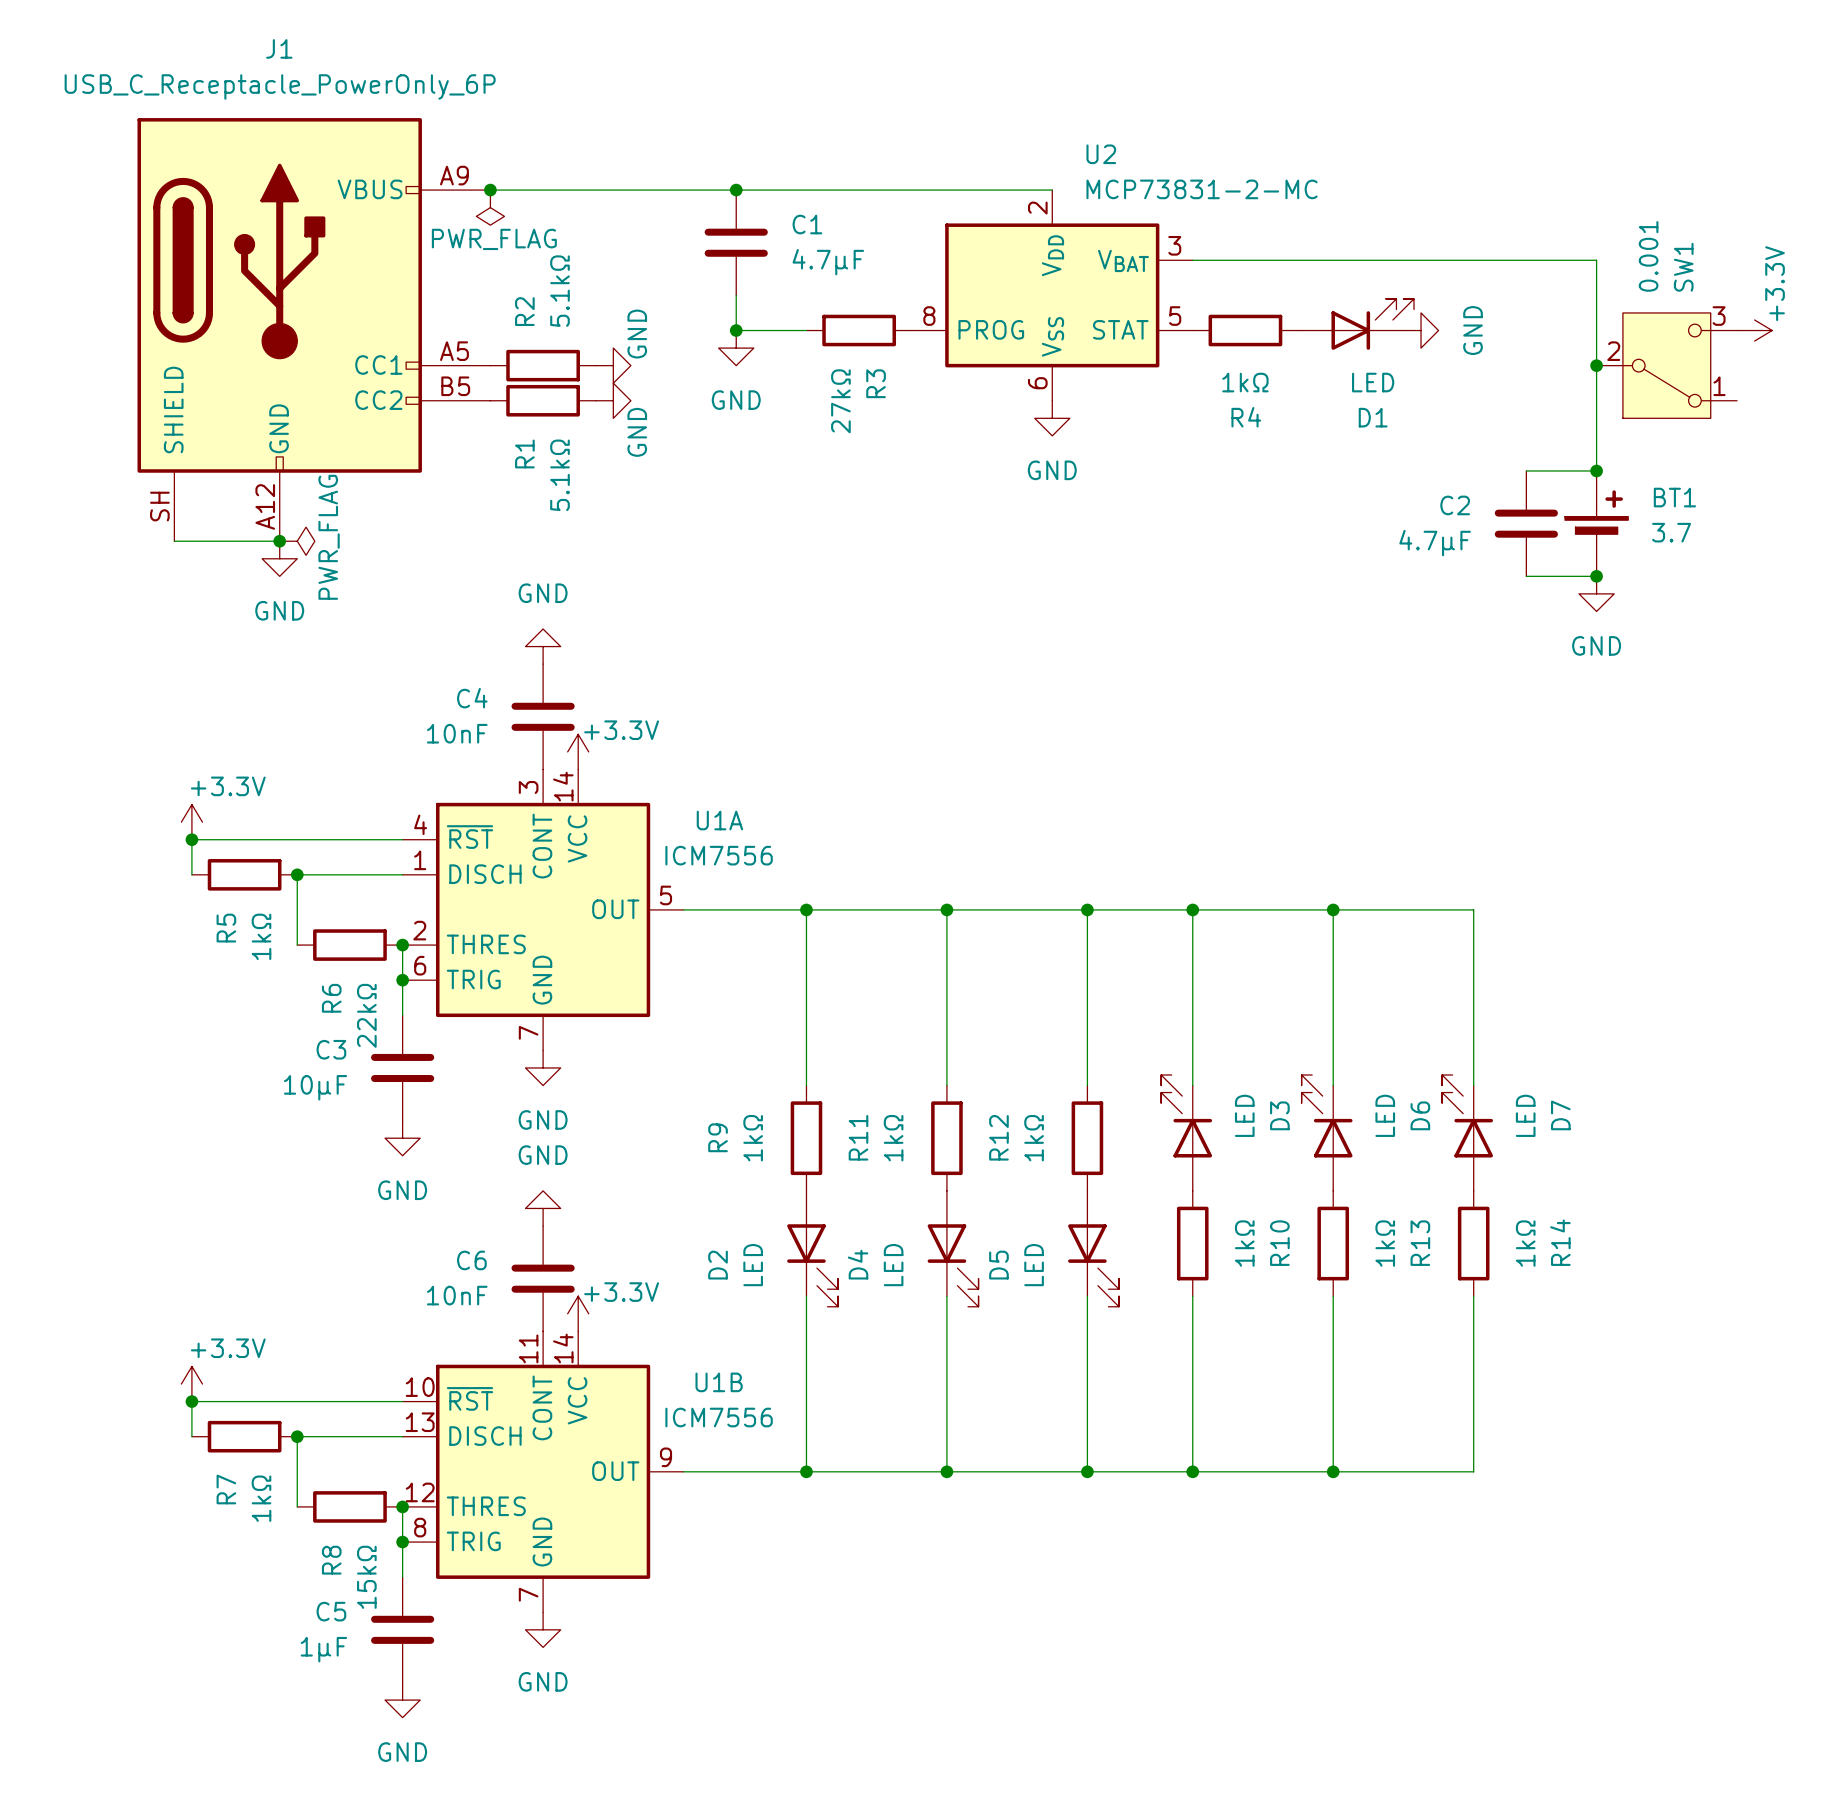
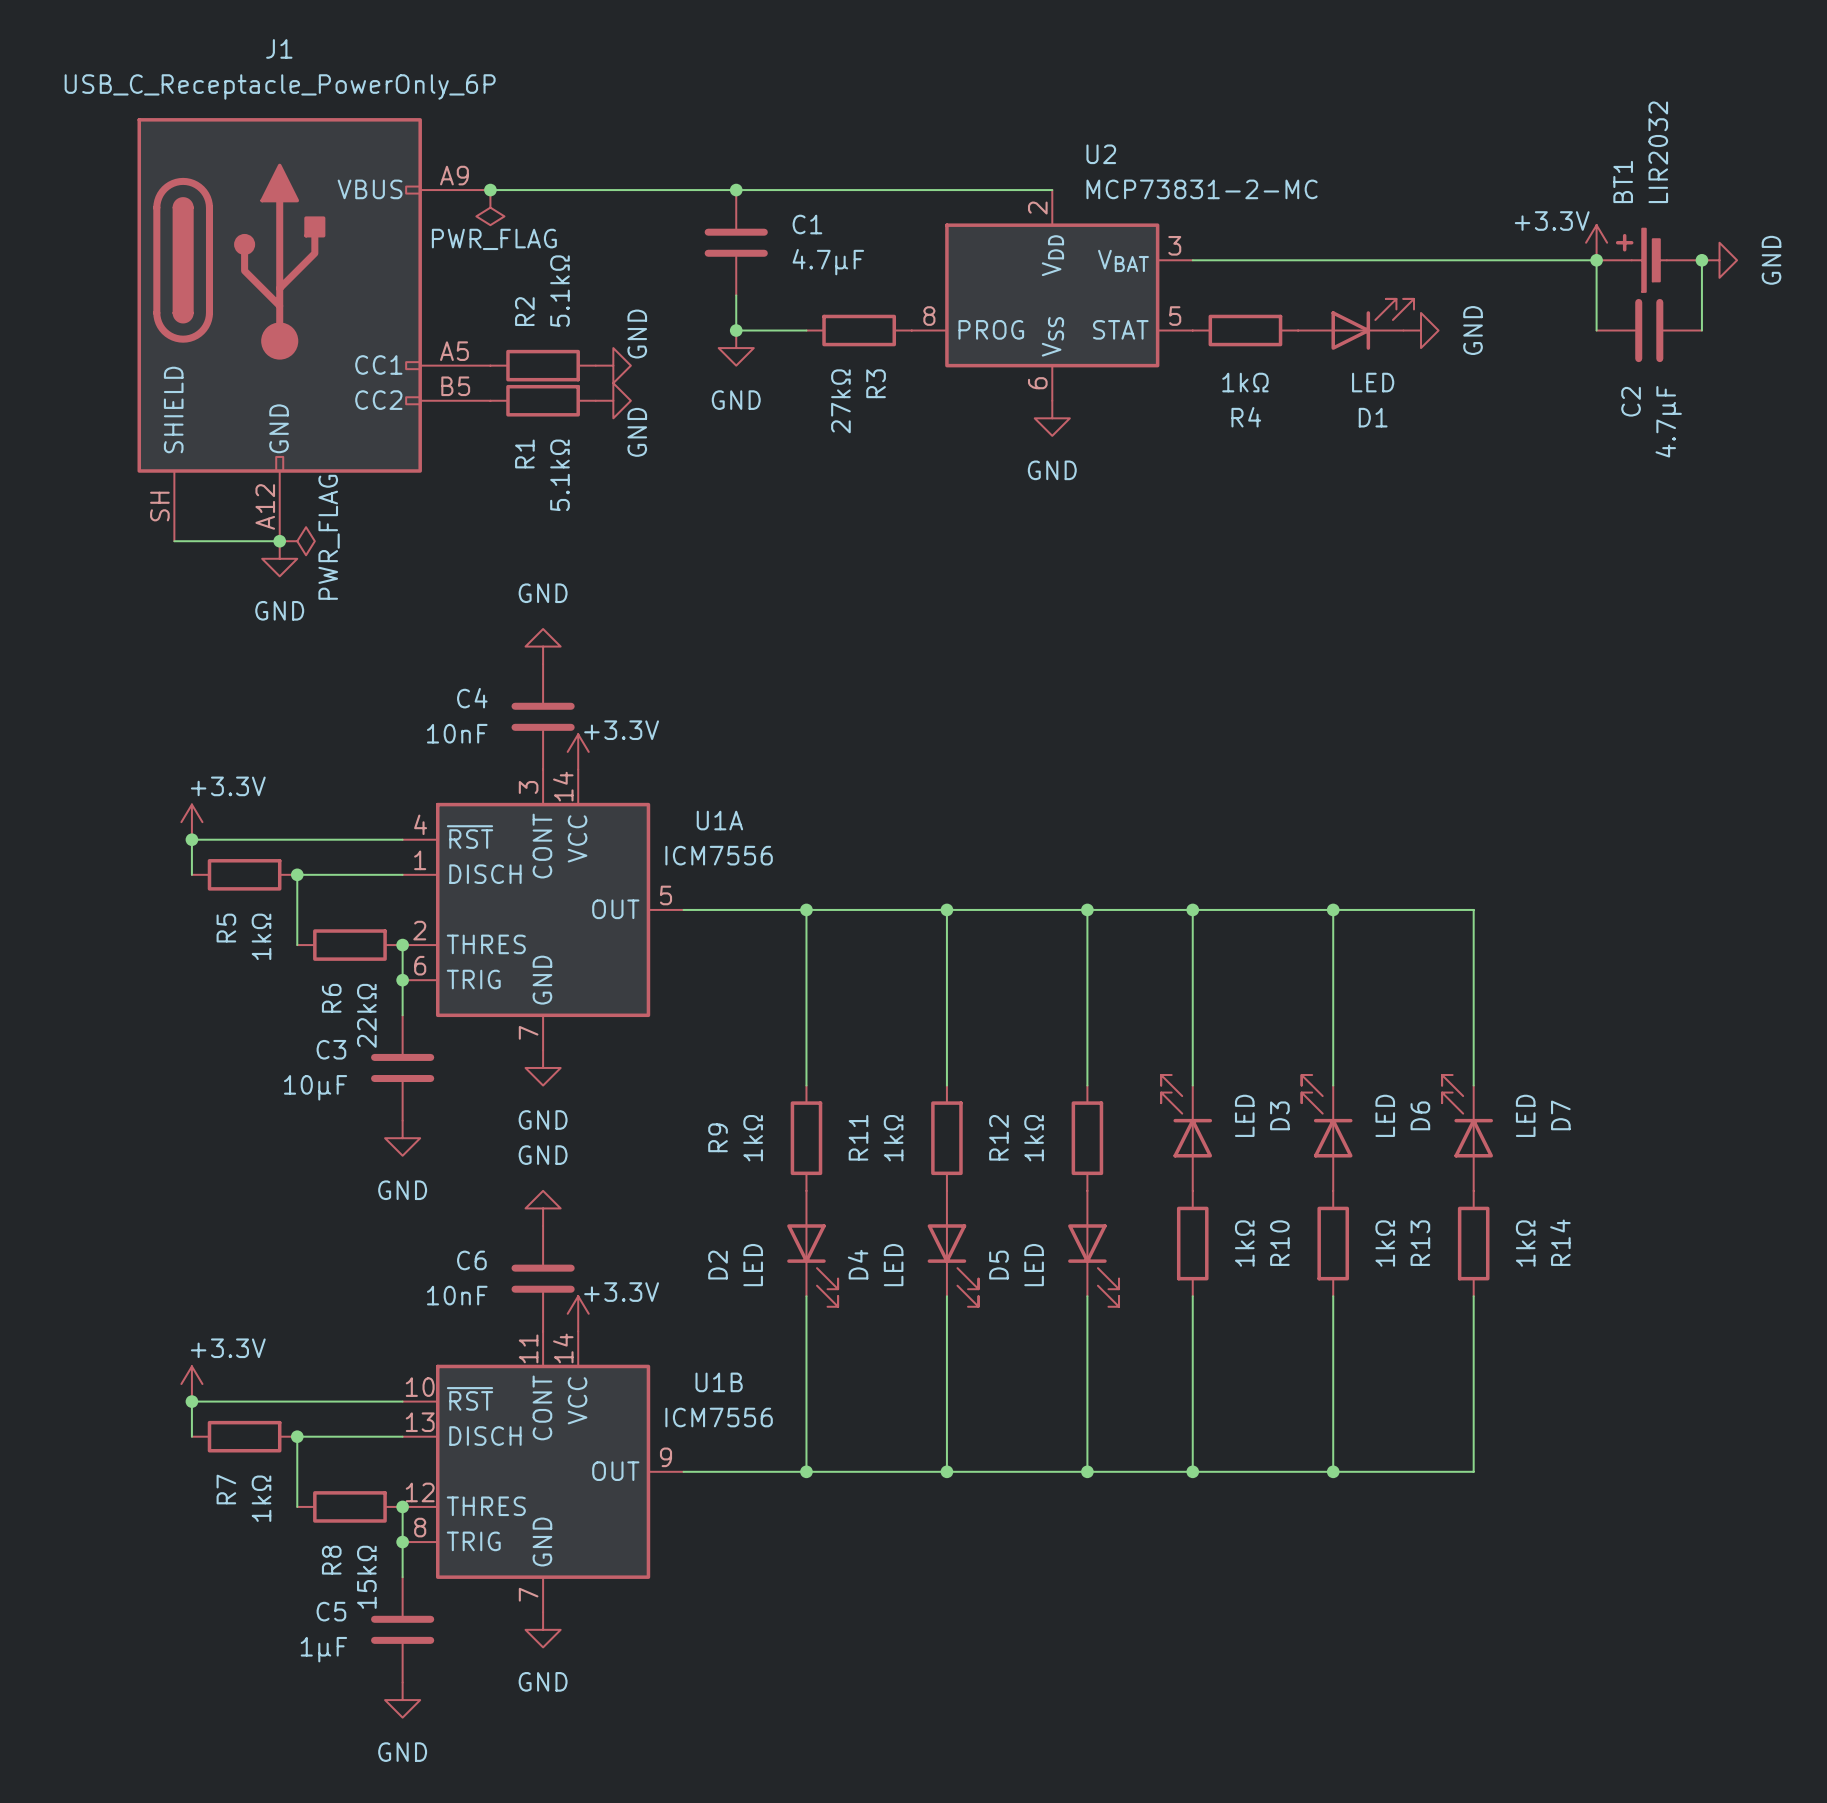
junction: none -> (1596, 260)
wire: none -> (1701, 260) (1701, 330)
junction: none -> (1701, 260)
power symbol: none -> GND (1719, 260)
wire: (1596, 330) (1596, 470) (1526, 470) -> none
power symbol rotation: 0° (1754, 330) -> 90° counterclockwise (1596, 242)
power symbol position: +3.3V (1754, 330) -> +3.3V (1596, 242)
junction: (1596, 365) -> none
SW1: 0.001 (1666, 365) -> none
junction: (1596, 470) -> none
C2 name position: C2 (1455, 505) -> C2 (1631, 401)
BT1 rotation: 0° (1596, 515) -> 90° counterclockwise (1641, 260)
C2 rotation: 0° (1526, 523) -> 90° clockwise (1649, 330)
C2 position: (1526, 523) -> (1649, 330)
BT1 position: (1596, 523) -> (1649, 260)
BT1 value: 3.7 (1671, 532) -> LIR2032 (1658, 152)
C2 value position: 4.7µF (1435, 543) -> 4.7µF (1668, 421)
wire: (1526, 576) (1596, 576) -> none
junction: (1596, 576) -> none
power symbol: GND (1596, 593) -> none

